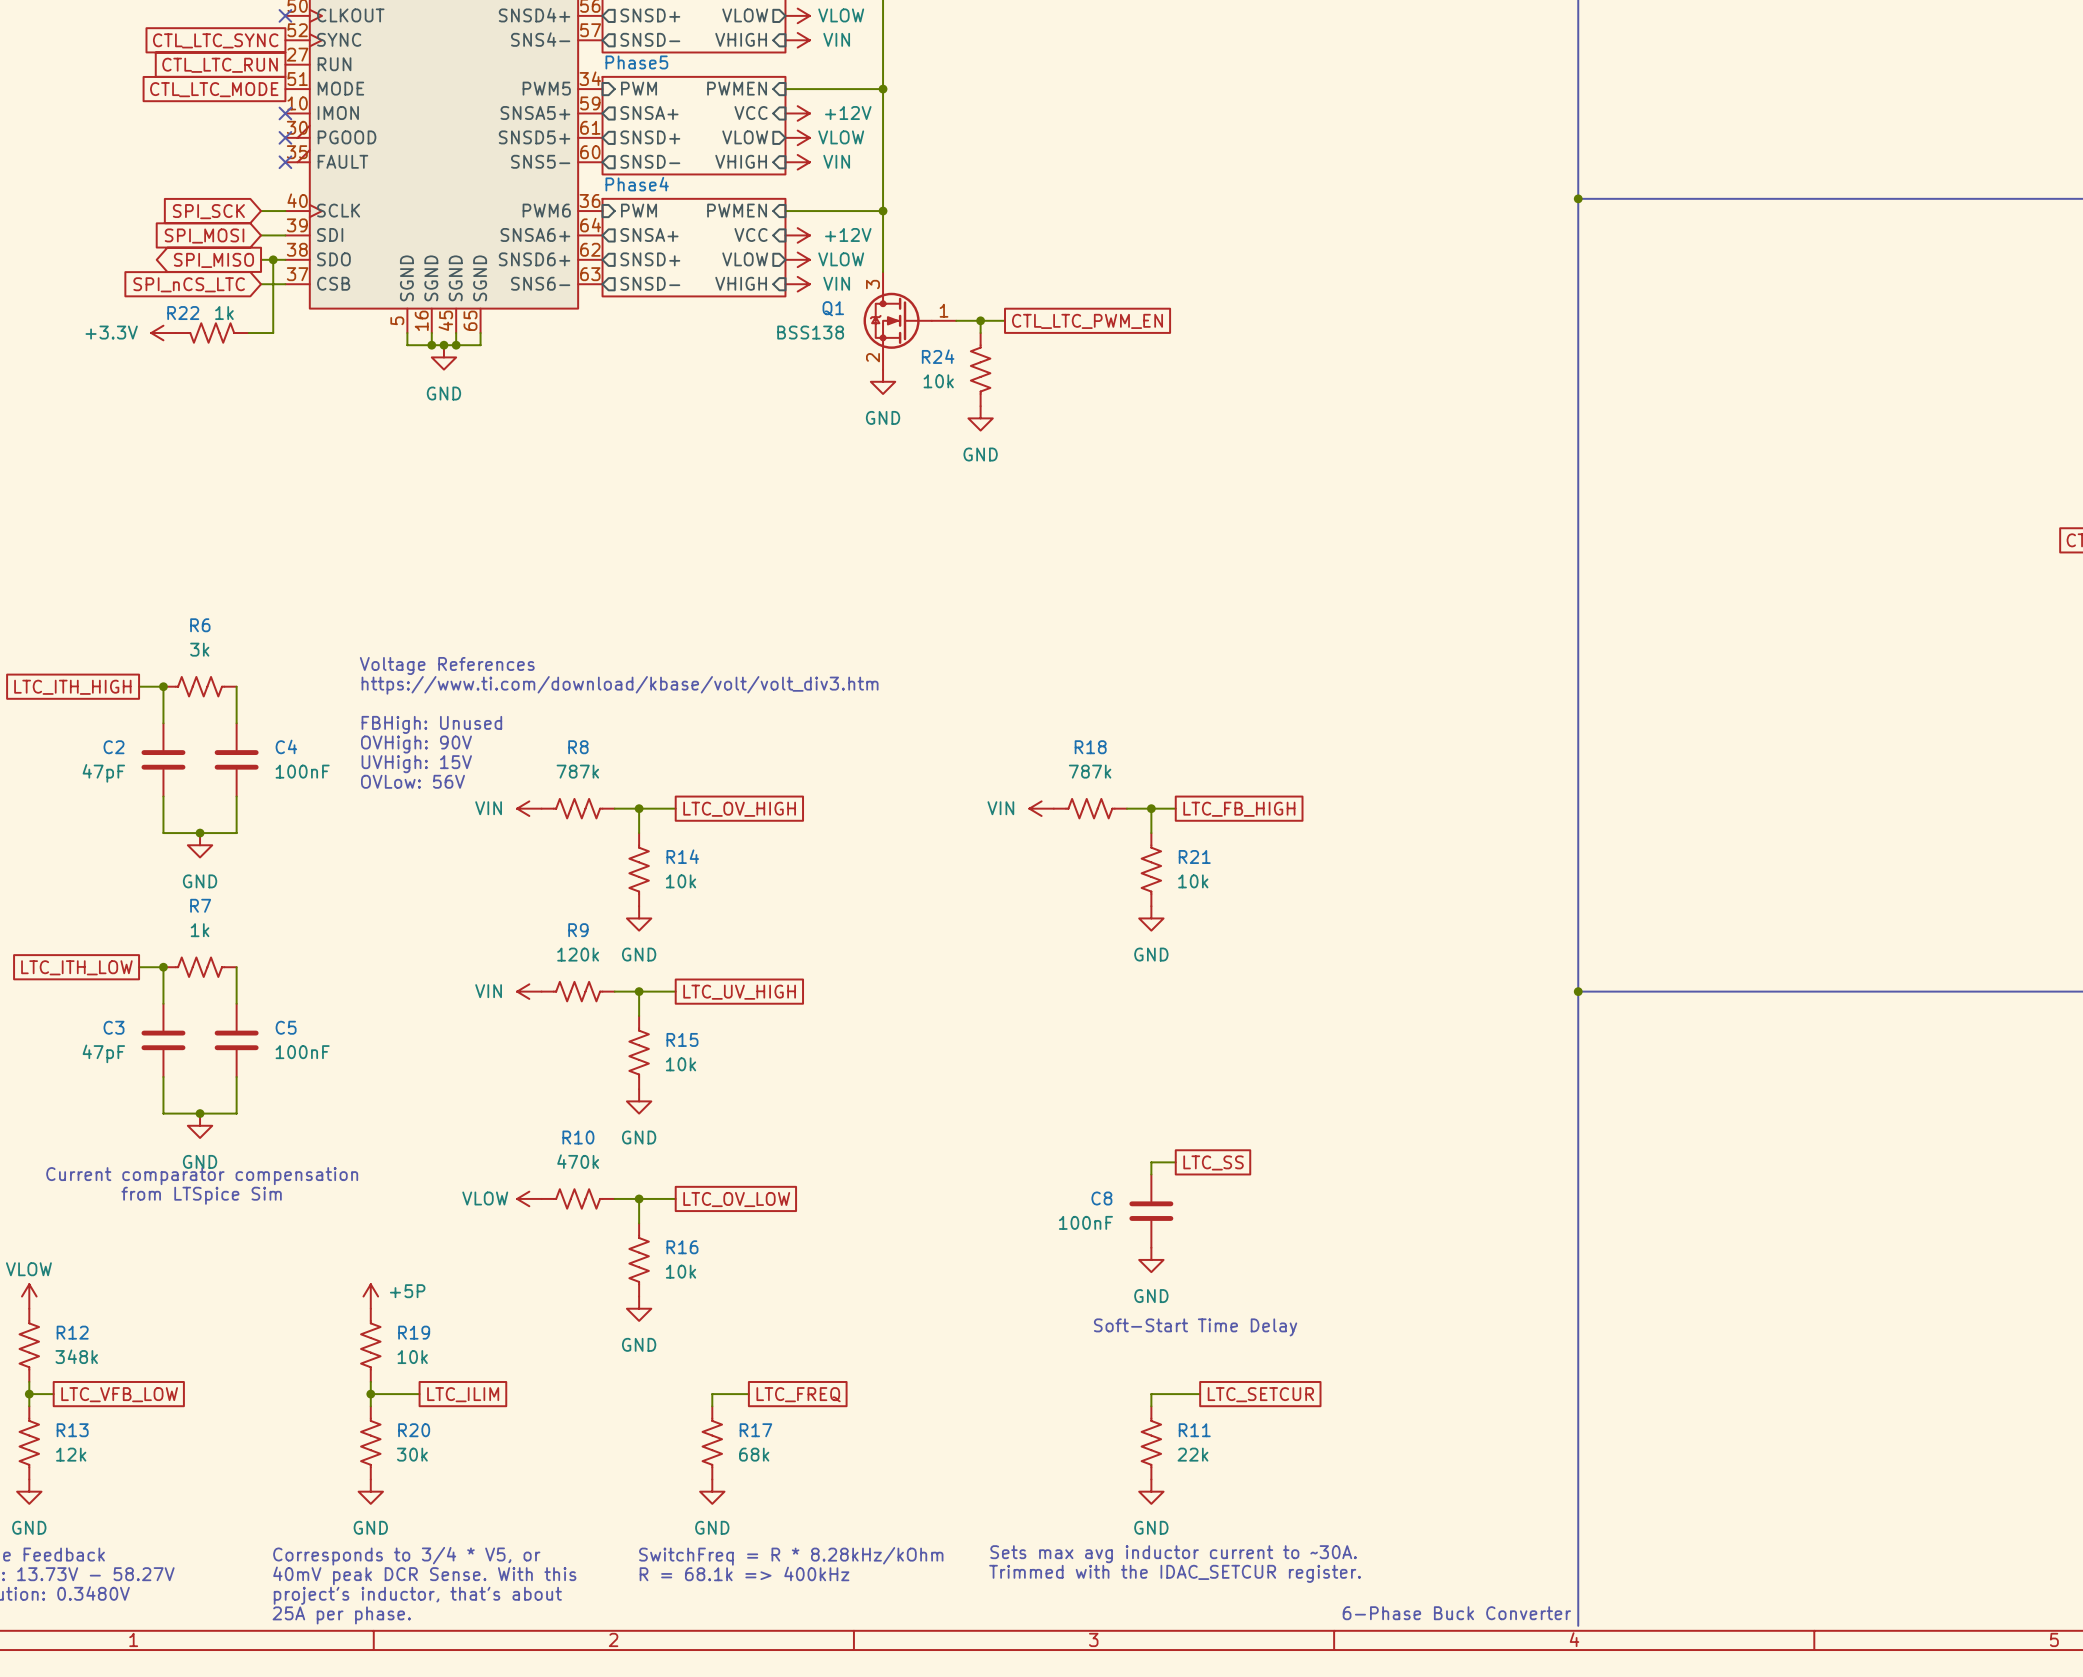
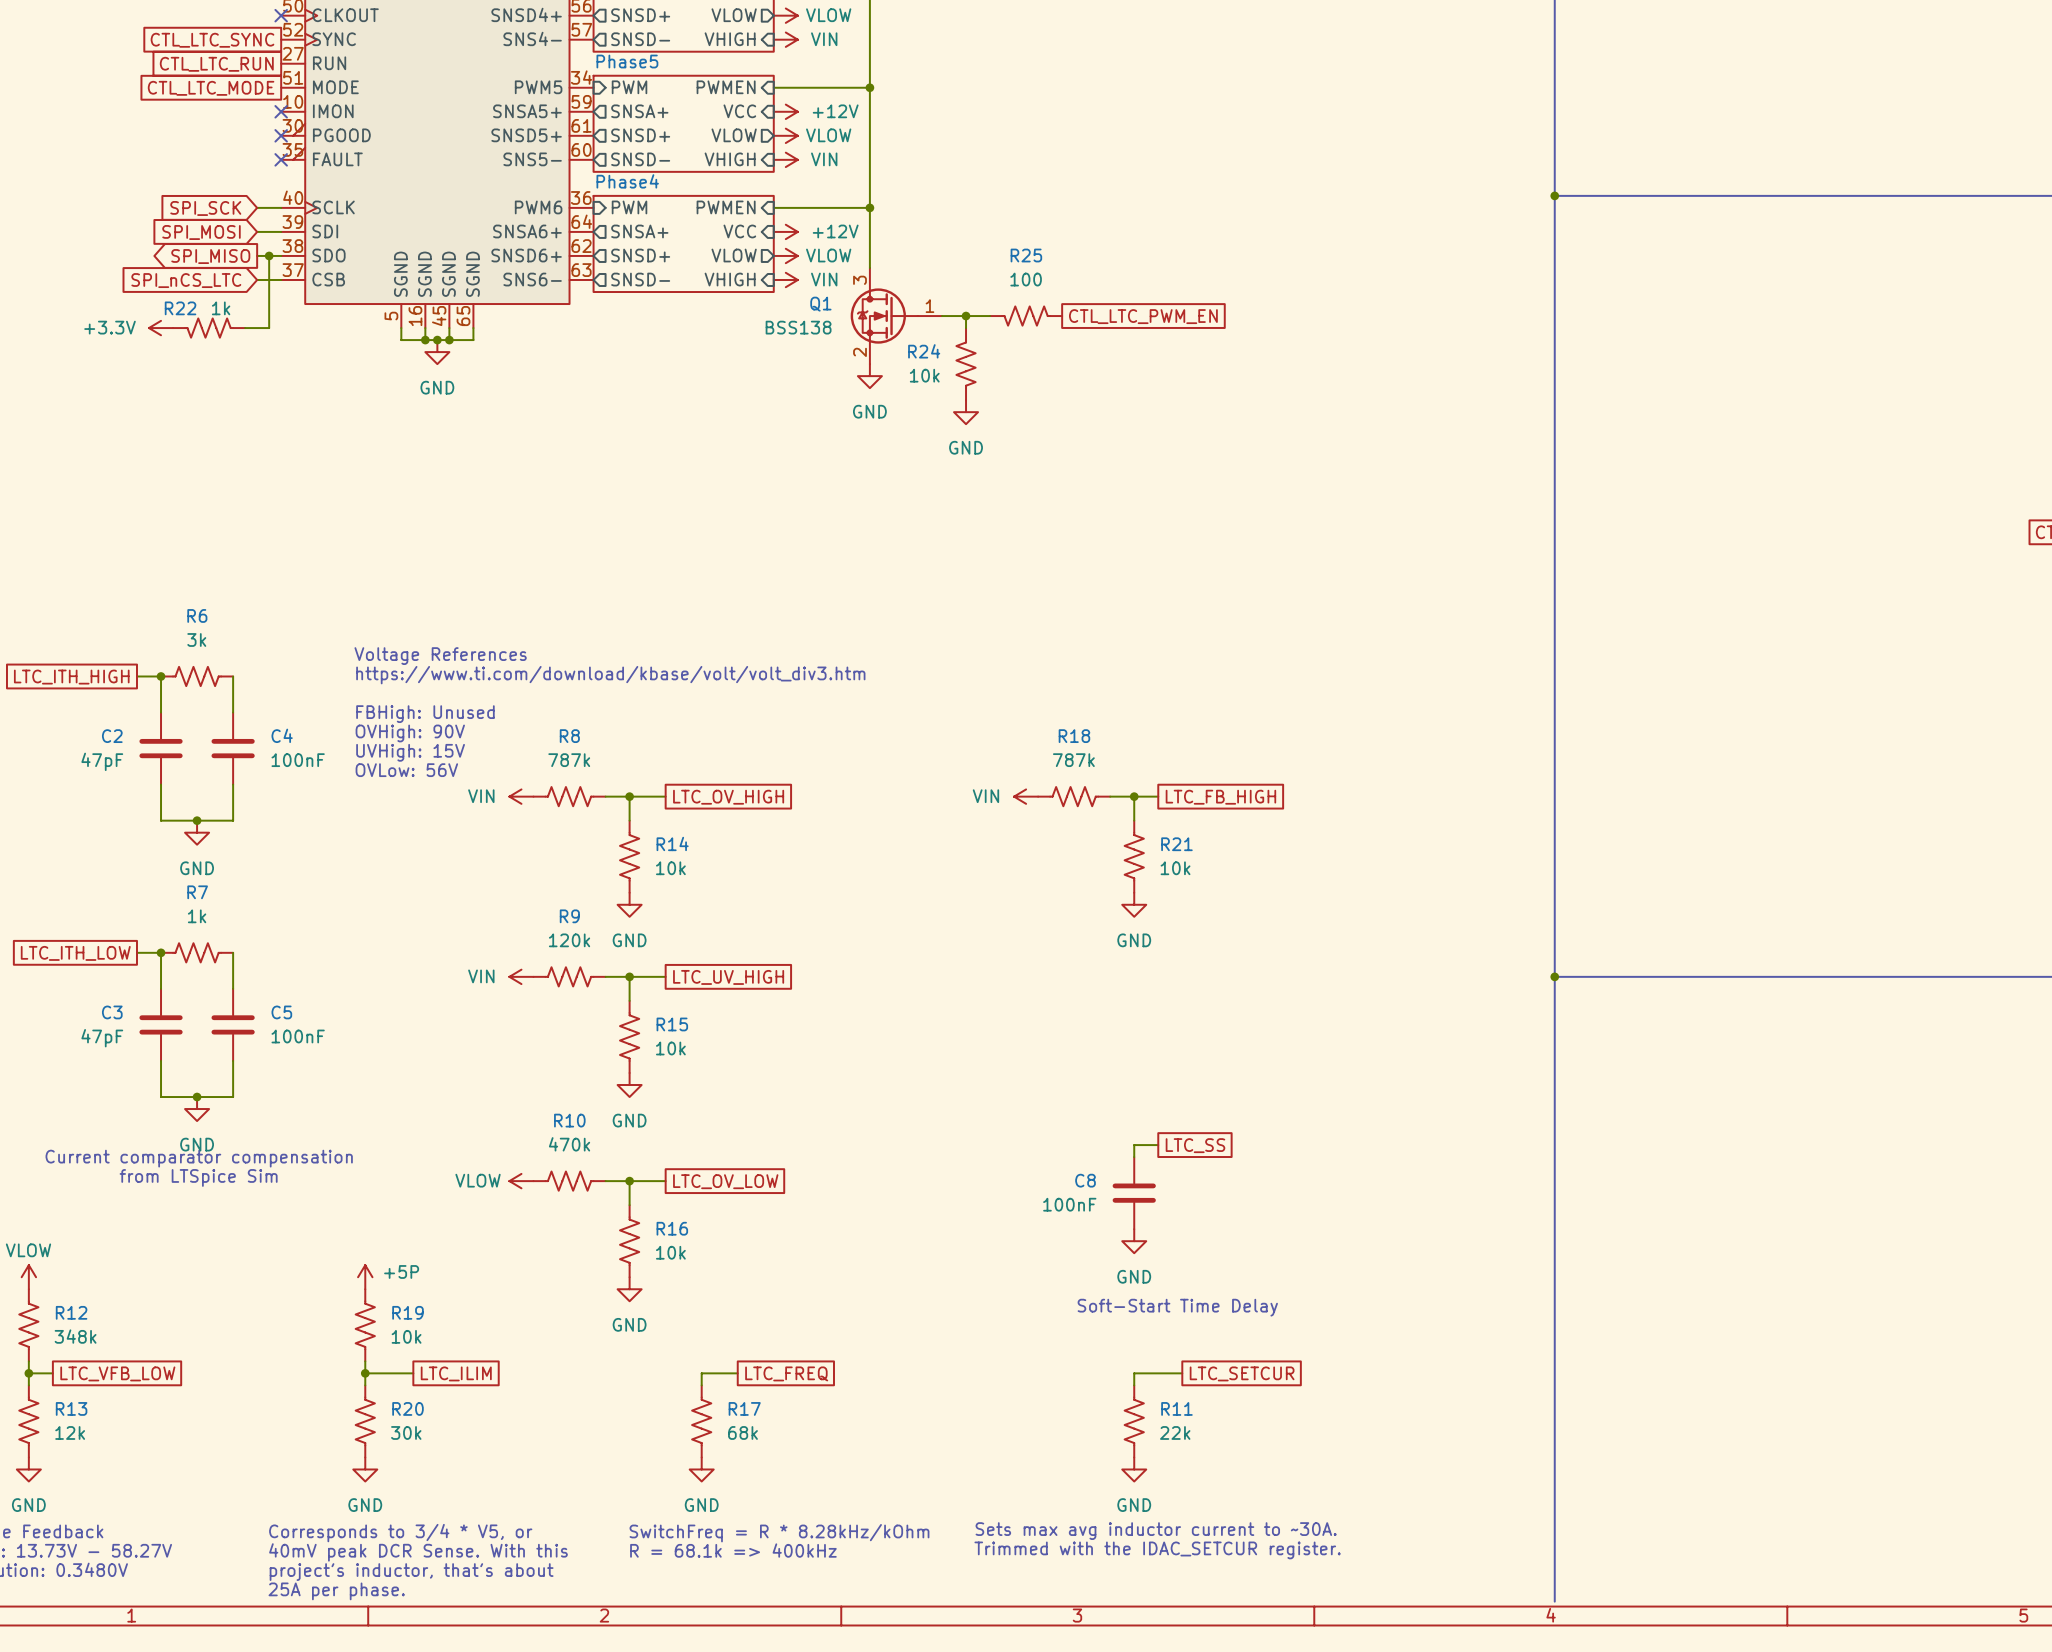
R25: none -> 100 (1026, 316)
global label position: CTL_LTC_PWM_EN (1087, 321) -> CTL_LTC_PWM_EN (1143, 316)
text: 6-Phase Buck Converter (1456, 1613) -> none

